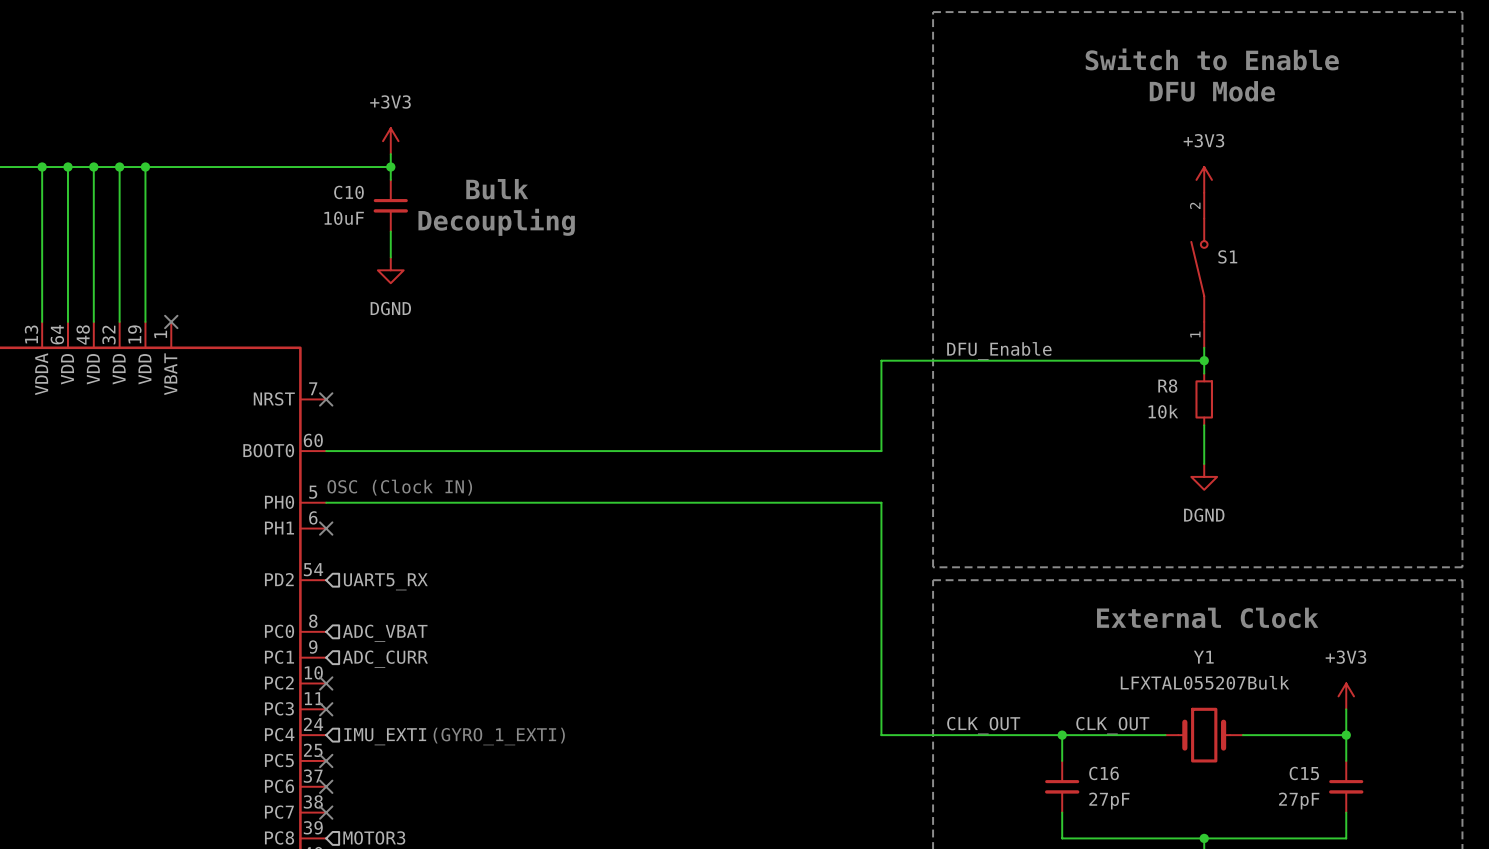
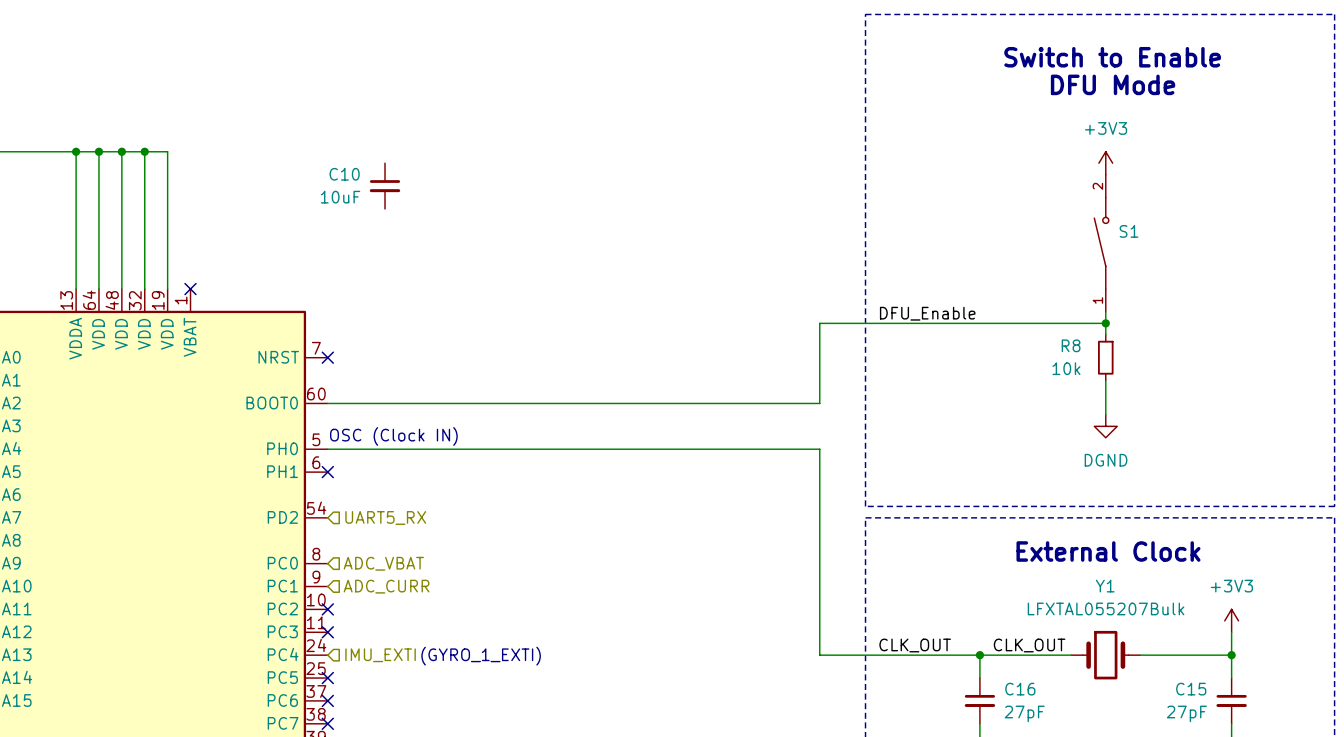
power symbol: +3V3 (390, 141) -> none
wire: (390, 154) (390, 179) -> none
wire: (145, 167) (390, 167) -> none
junction: (145, 167) -> none
junction: (390, 167) -> none
text: Bulk (497, 189) -> none
text: Decoupling (496, 222) -> none
wire: (390, 231) (390, 257) -> none
power symbol: DGND (390, 270) -> none

